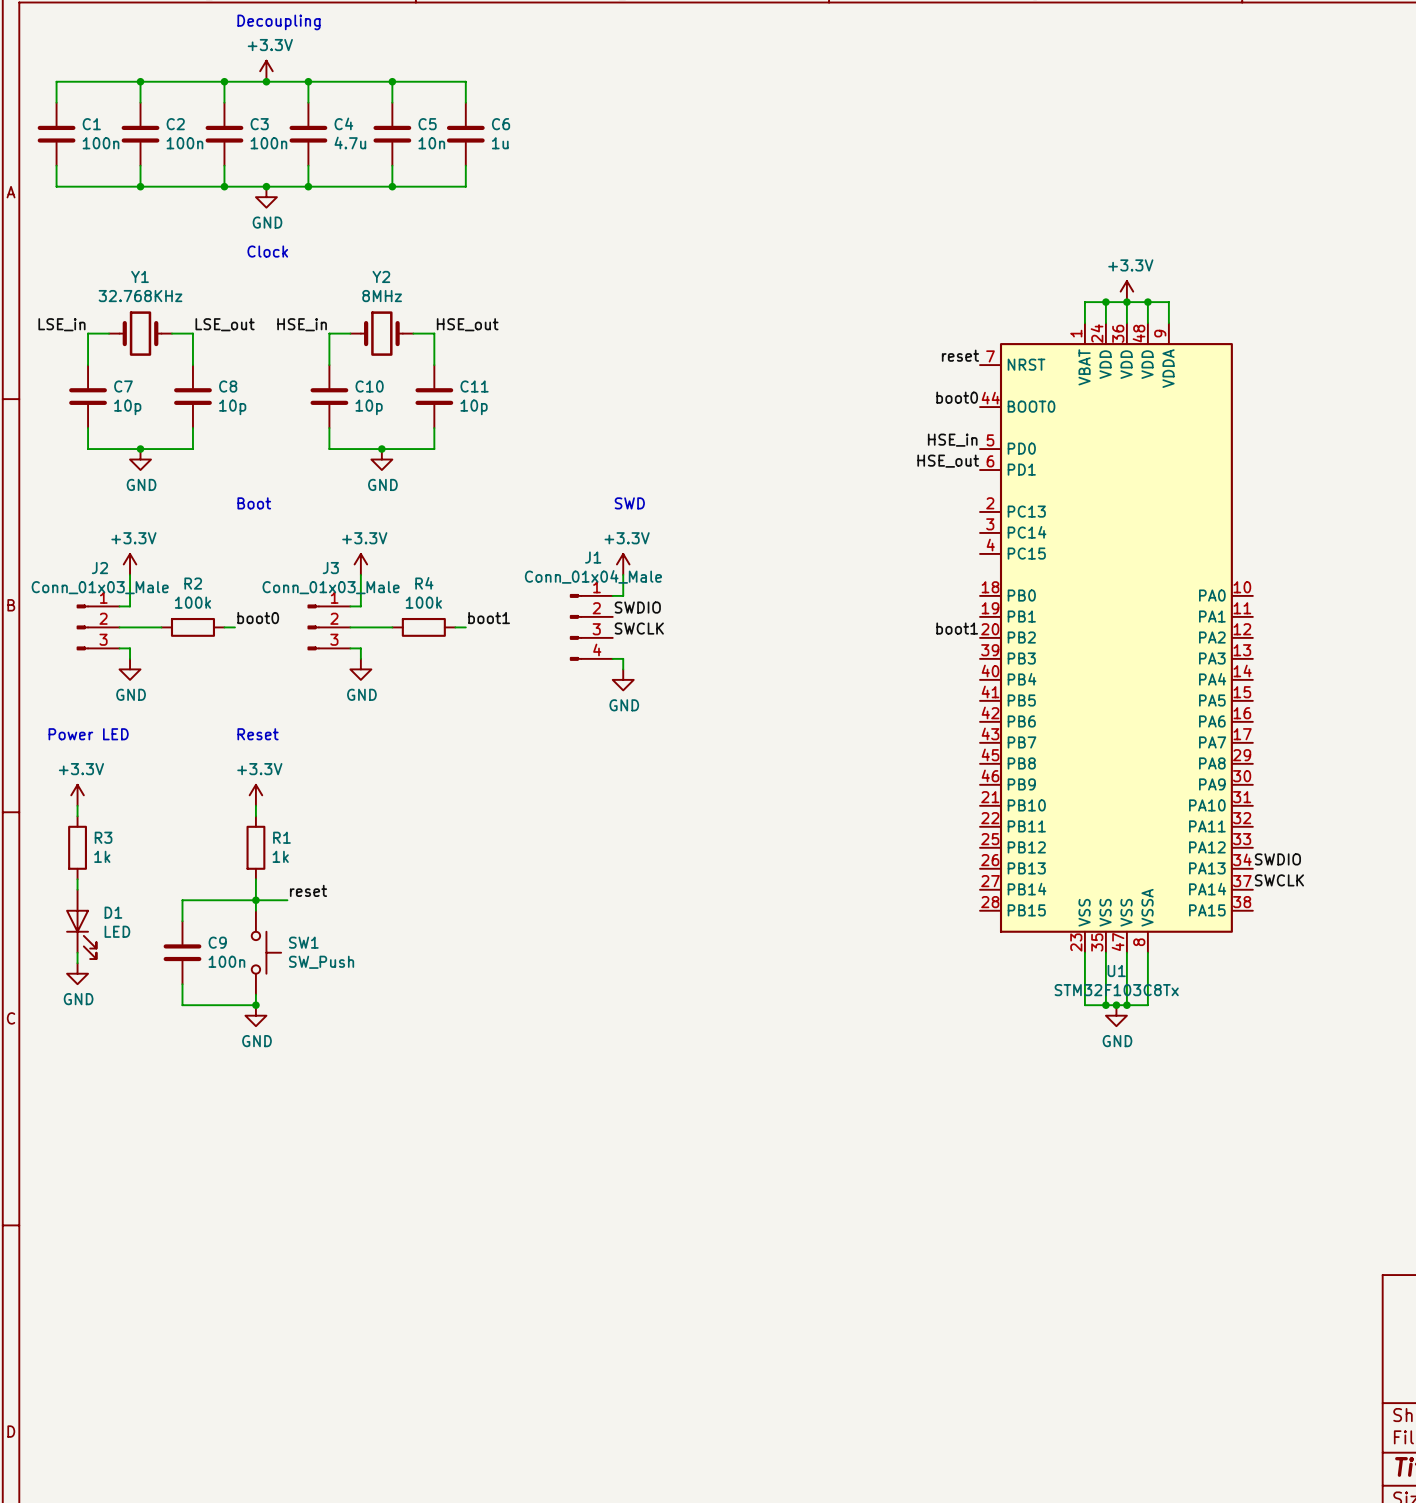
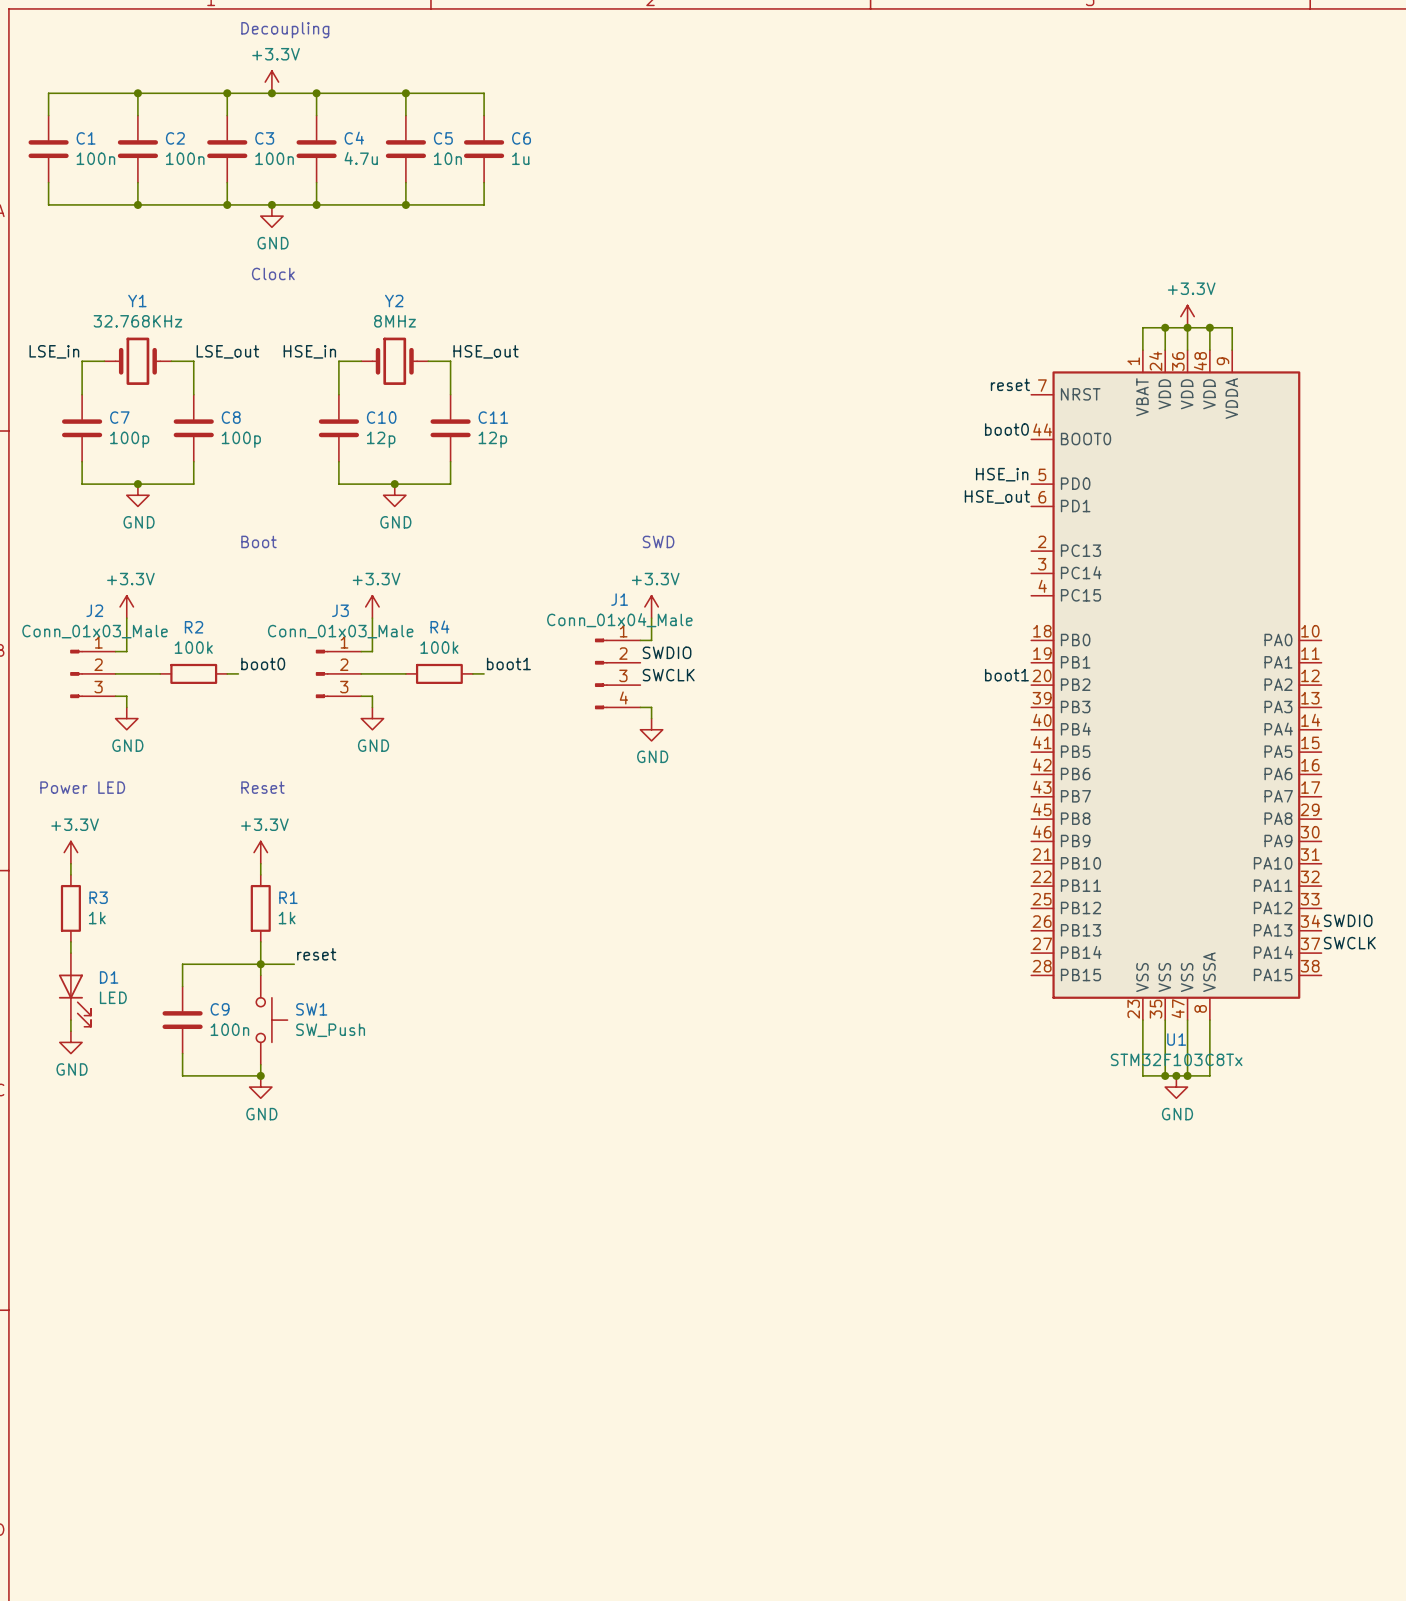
C7 value: 10p (127, 407) -> 100p (129, 439)
C8 value: 10p (232, 407) -> 100p (241, 439)
C10 value: 10p (369, 407) -> 12p (381, 439)
C11 value: 10p (474, 407) -> 12p (492, 439)

